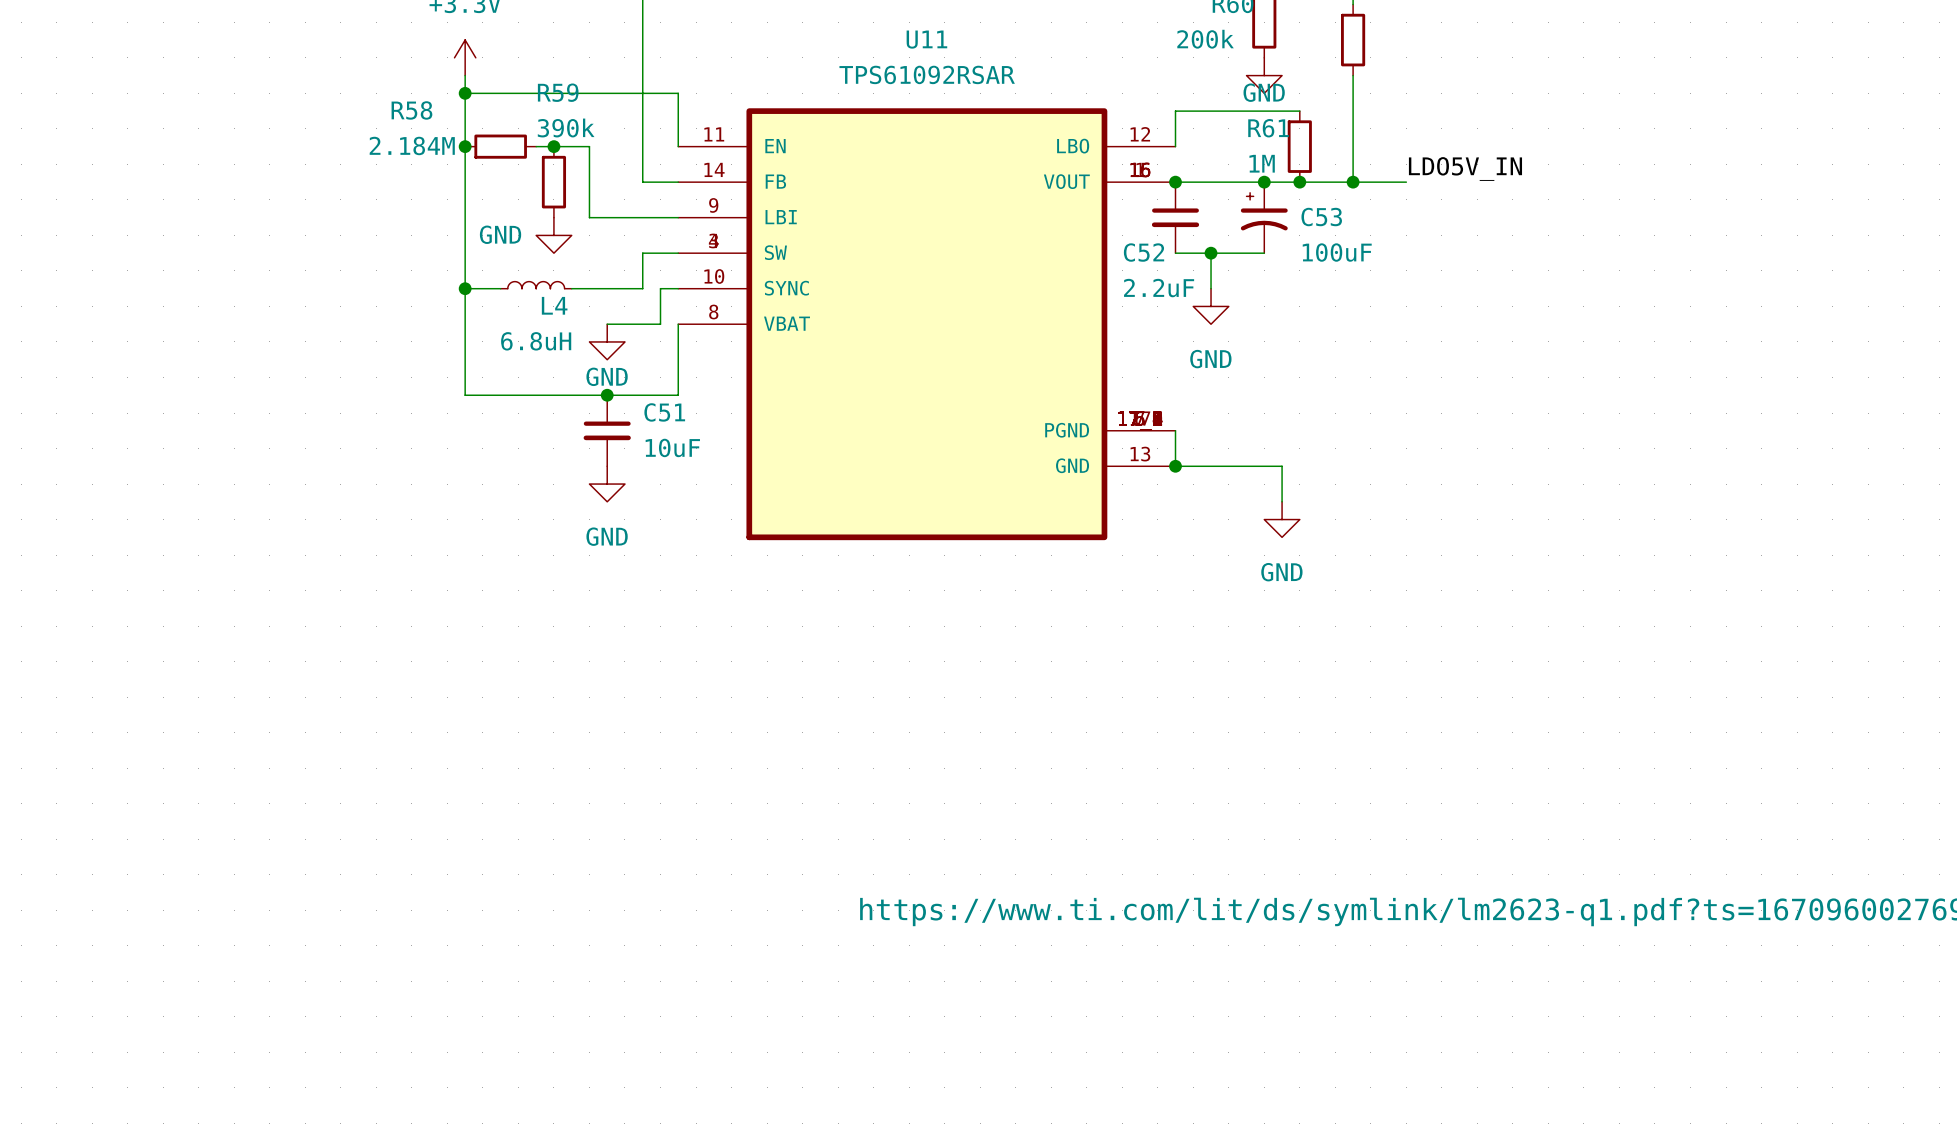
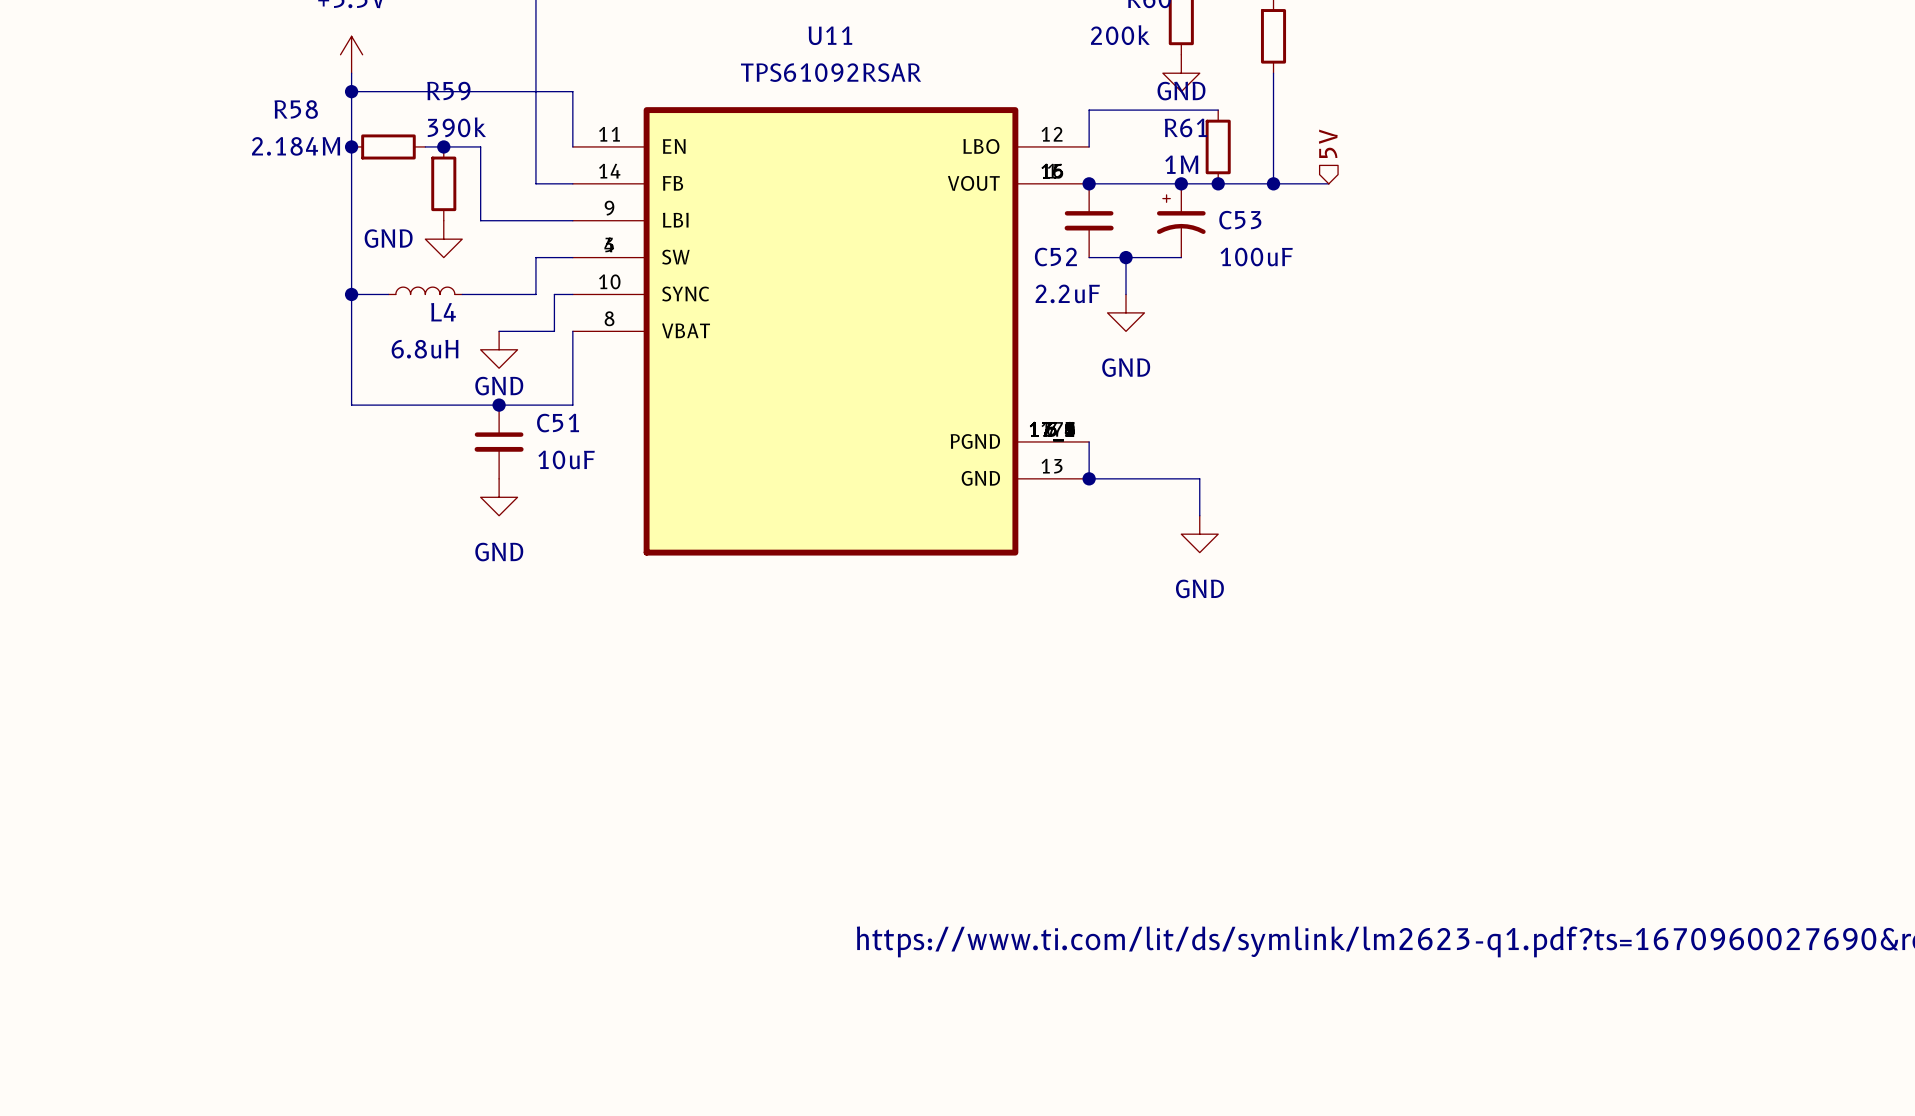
hierarchical label: none -> 5V (1328, 143)
label: LDO5V_IN (1465, 169) -> none

